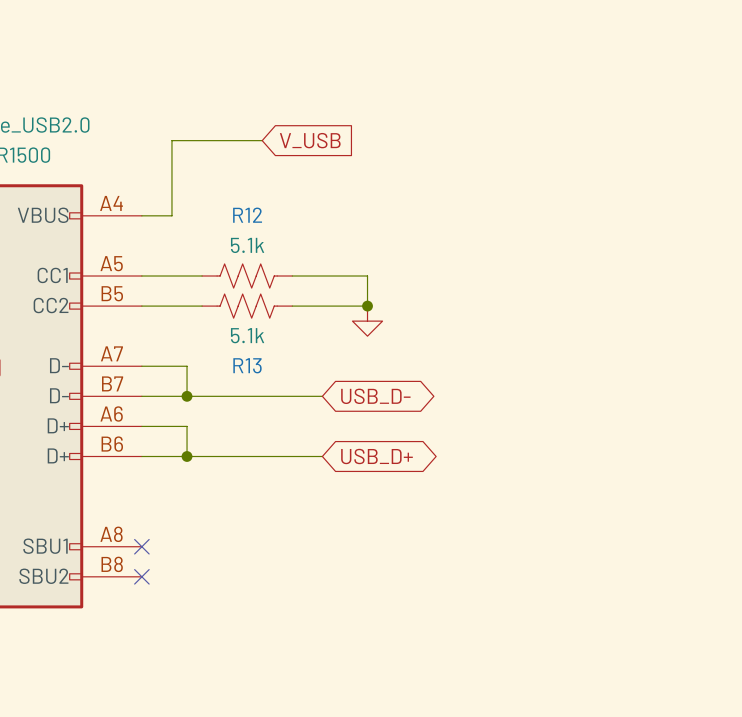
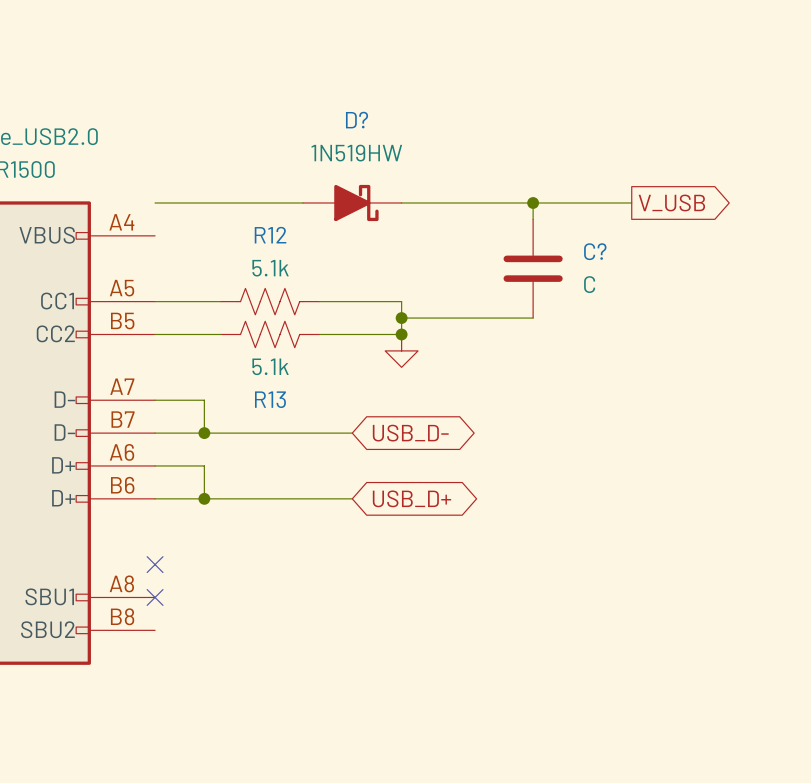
wire: (262, 140) (171, 140) (171, 215) (141, 215) -> none
global label: V_USB (310, 140) -> none
wire: none -> (155, 202) (302, 202)
D?: none -> 1N519HW (352, 202)
wire: none -> (401, 202) (631, 202)
wire: none -> (533, 202) (533, 219)
junction: none -> (533, 202)
global label: none -> V_USB (671, 202)
C?: none -> C (533, 268)
wire: none -> (401, 318) (533, 318)
junction: none -> (401, 318)
no-connect mark position: (141, 576) -> (155, 564)

